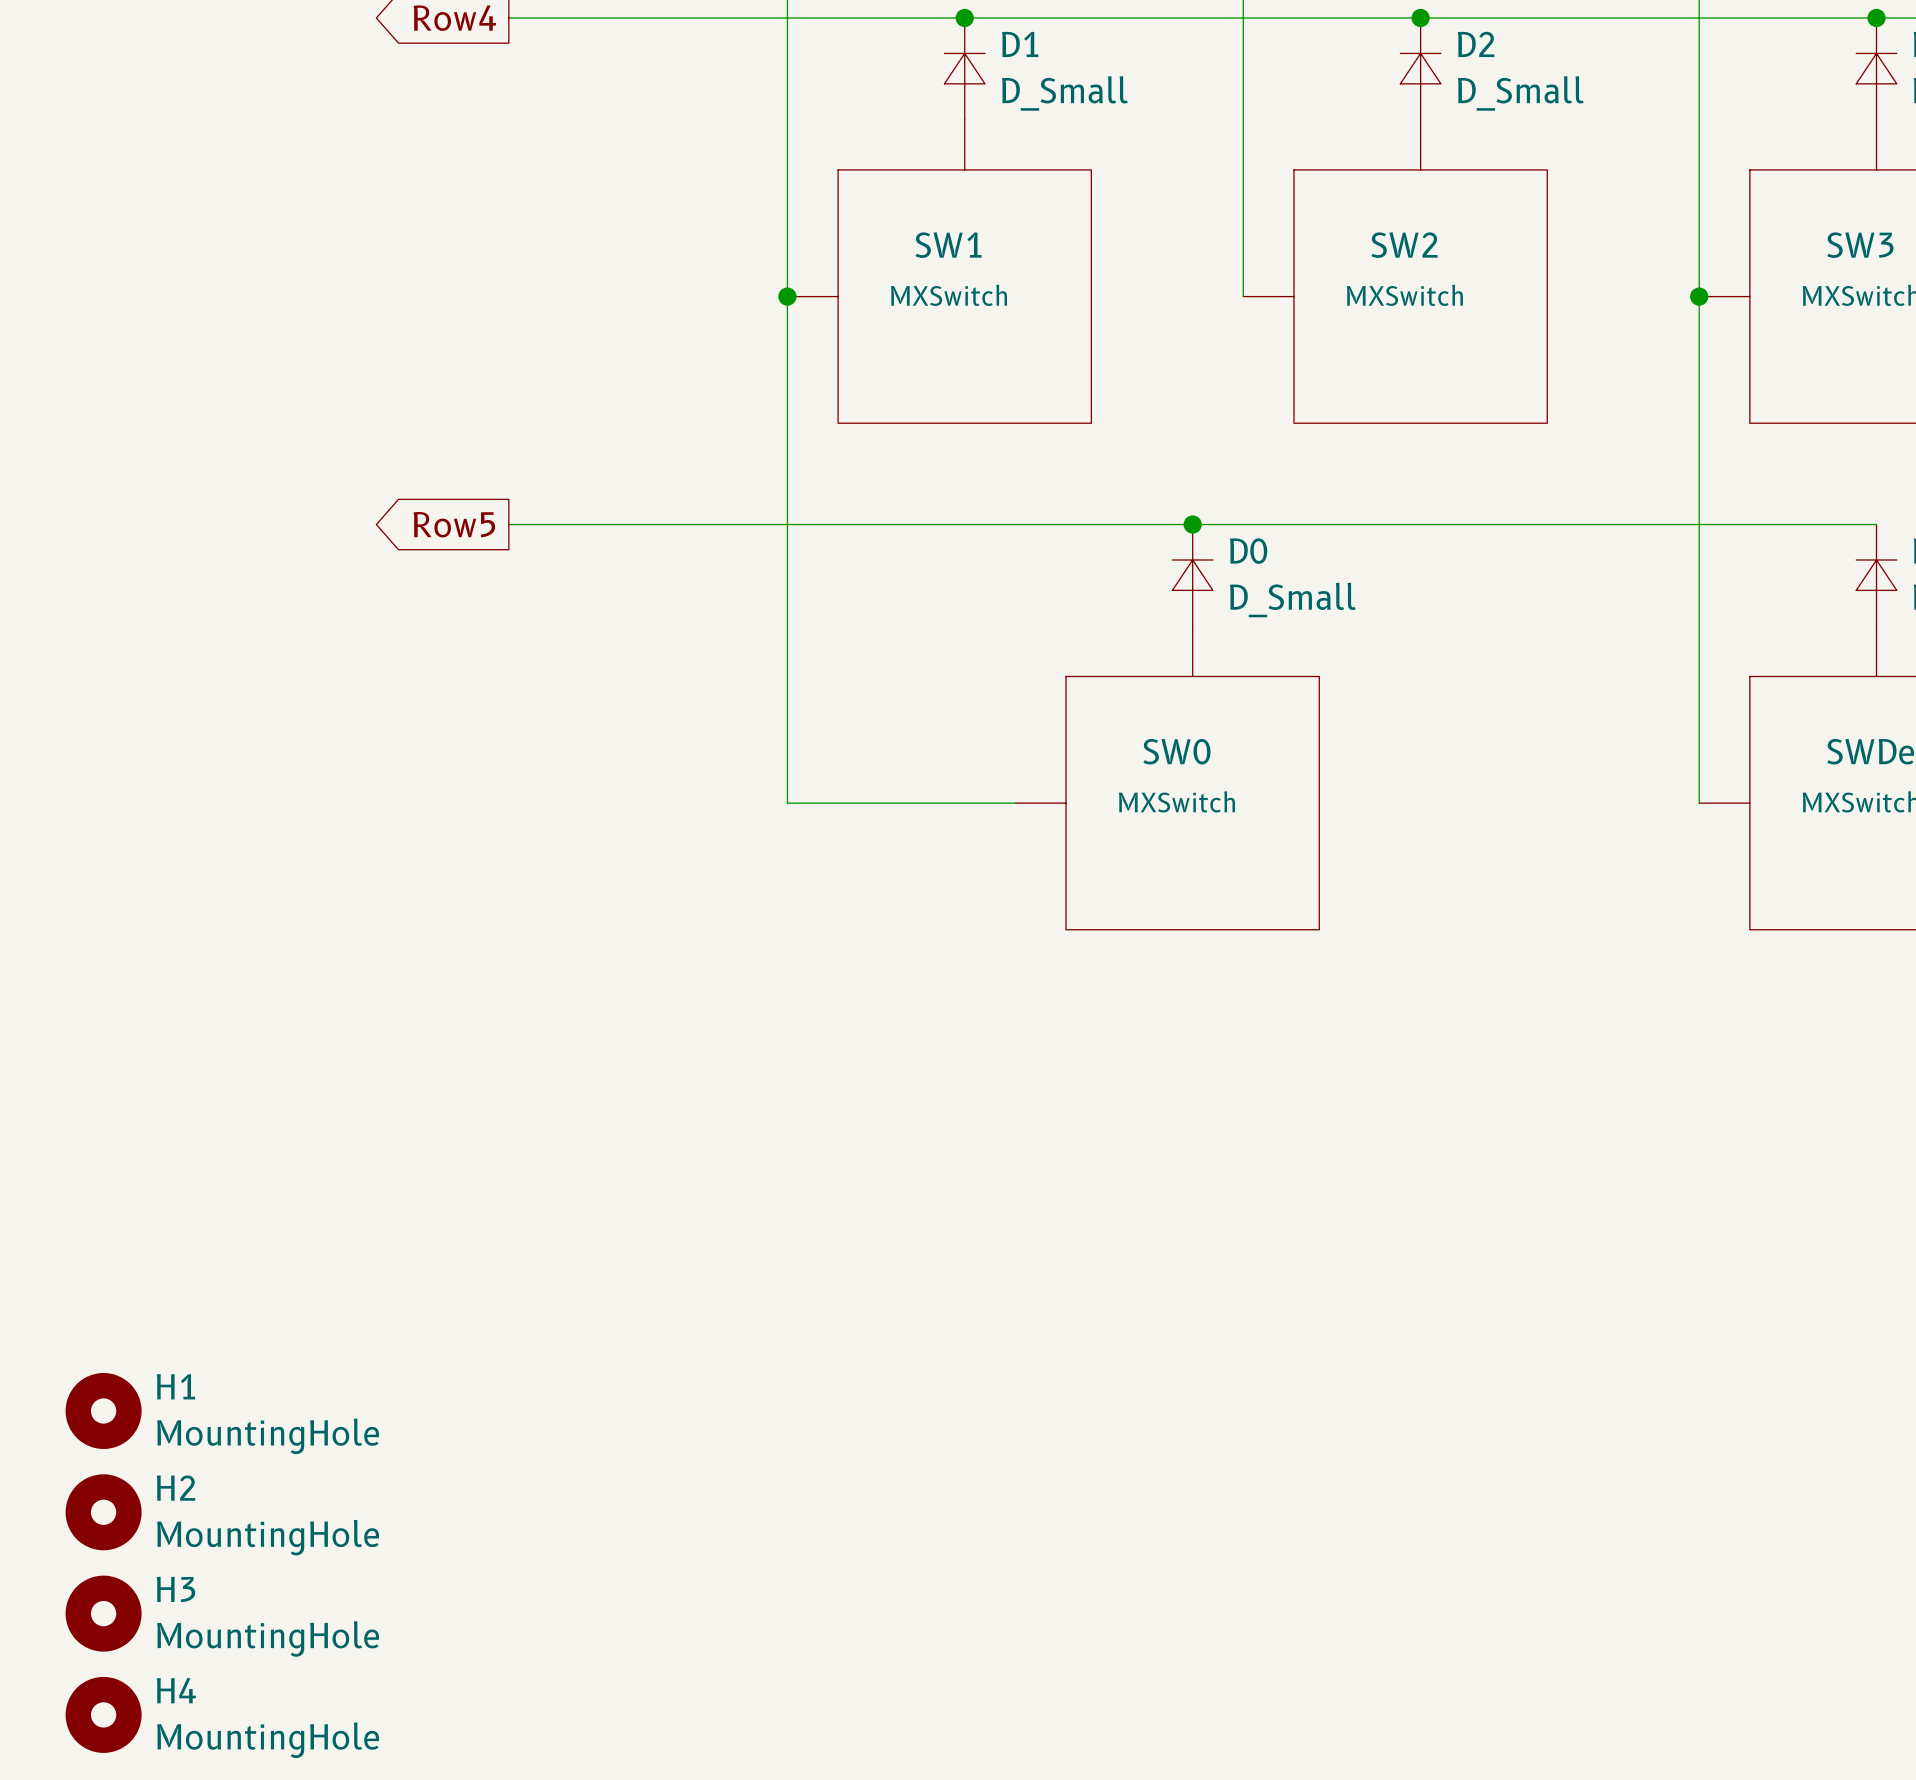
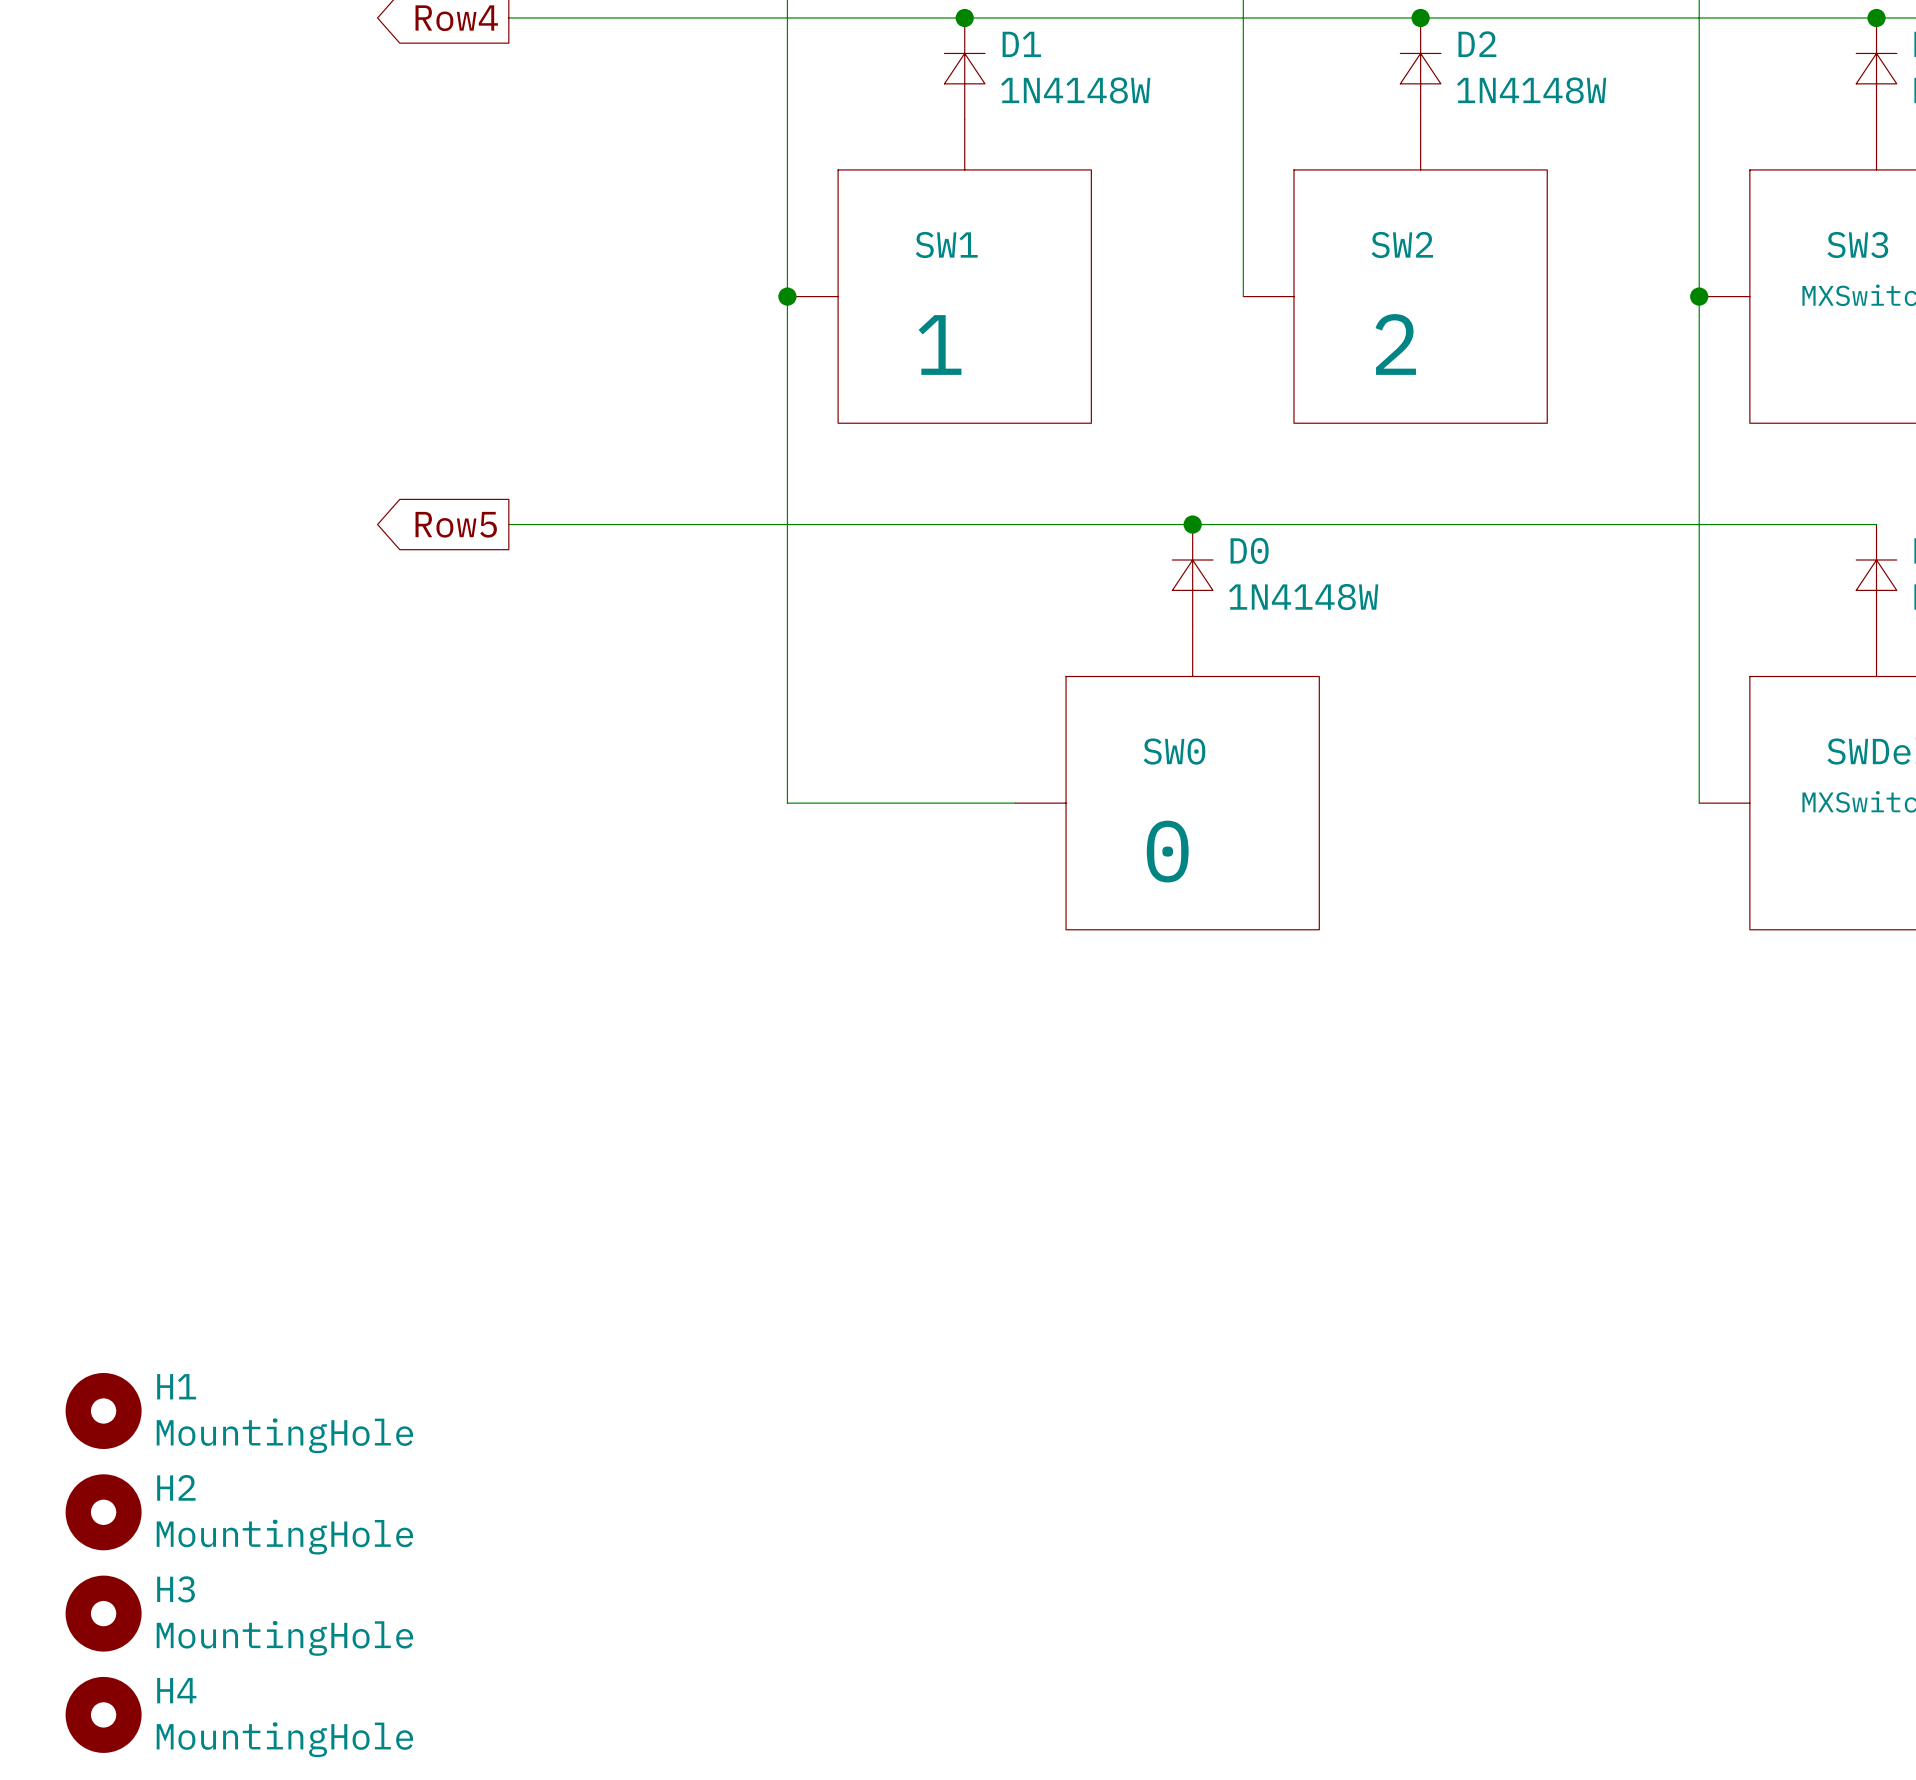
D1 value: D_Small (1064, 93) -> 1N4148W (1075, 90)
D2 value: D_Small (1520, 93) -> 1N4148W (1531, 90)
SW1 value: MXSwitch (948, 295) -> 1 (940, 345)
SW2 value: MXSwitch (1404, 295) -> 2 (1395, 344)
D0 value: D_Small (1292, 599) -> 1N4148W (1303, 597)
SW0 value: MXSwitch (1176, 801) -> 0 (1167, 851)

